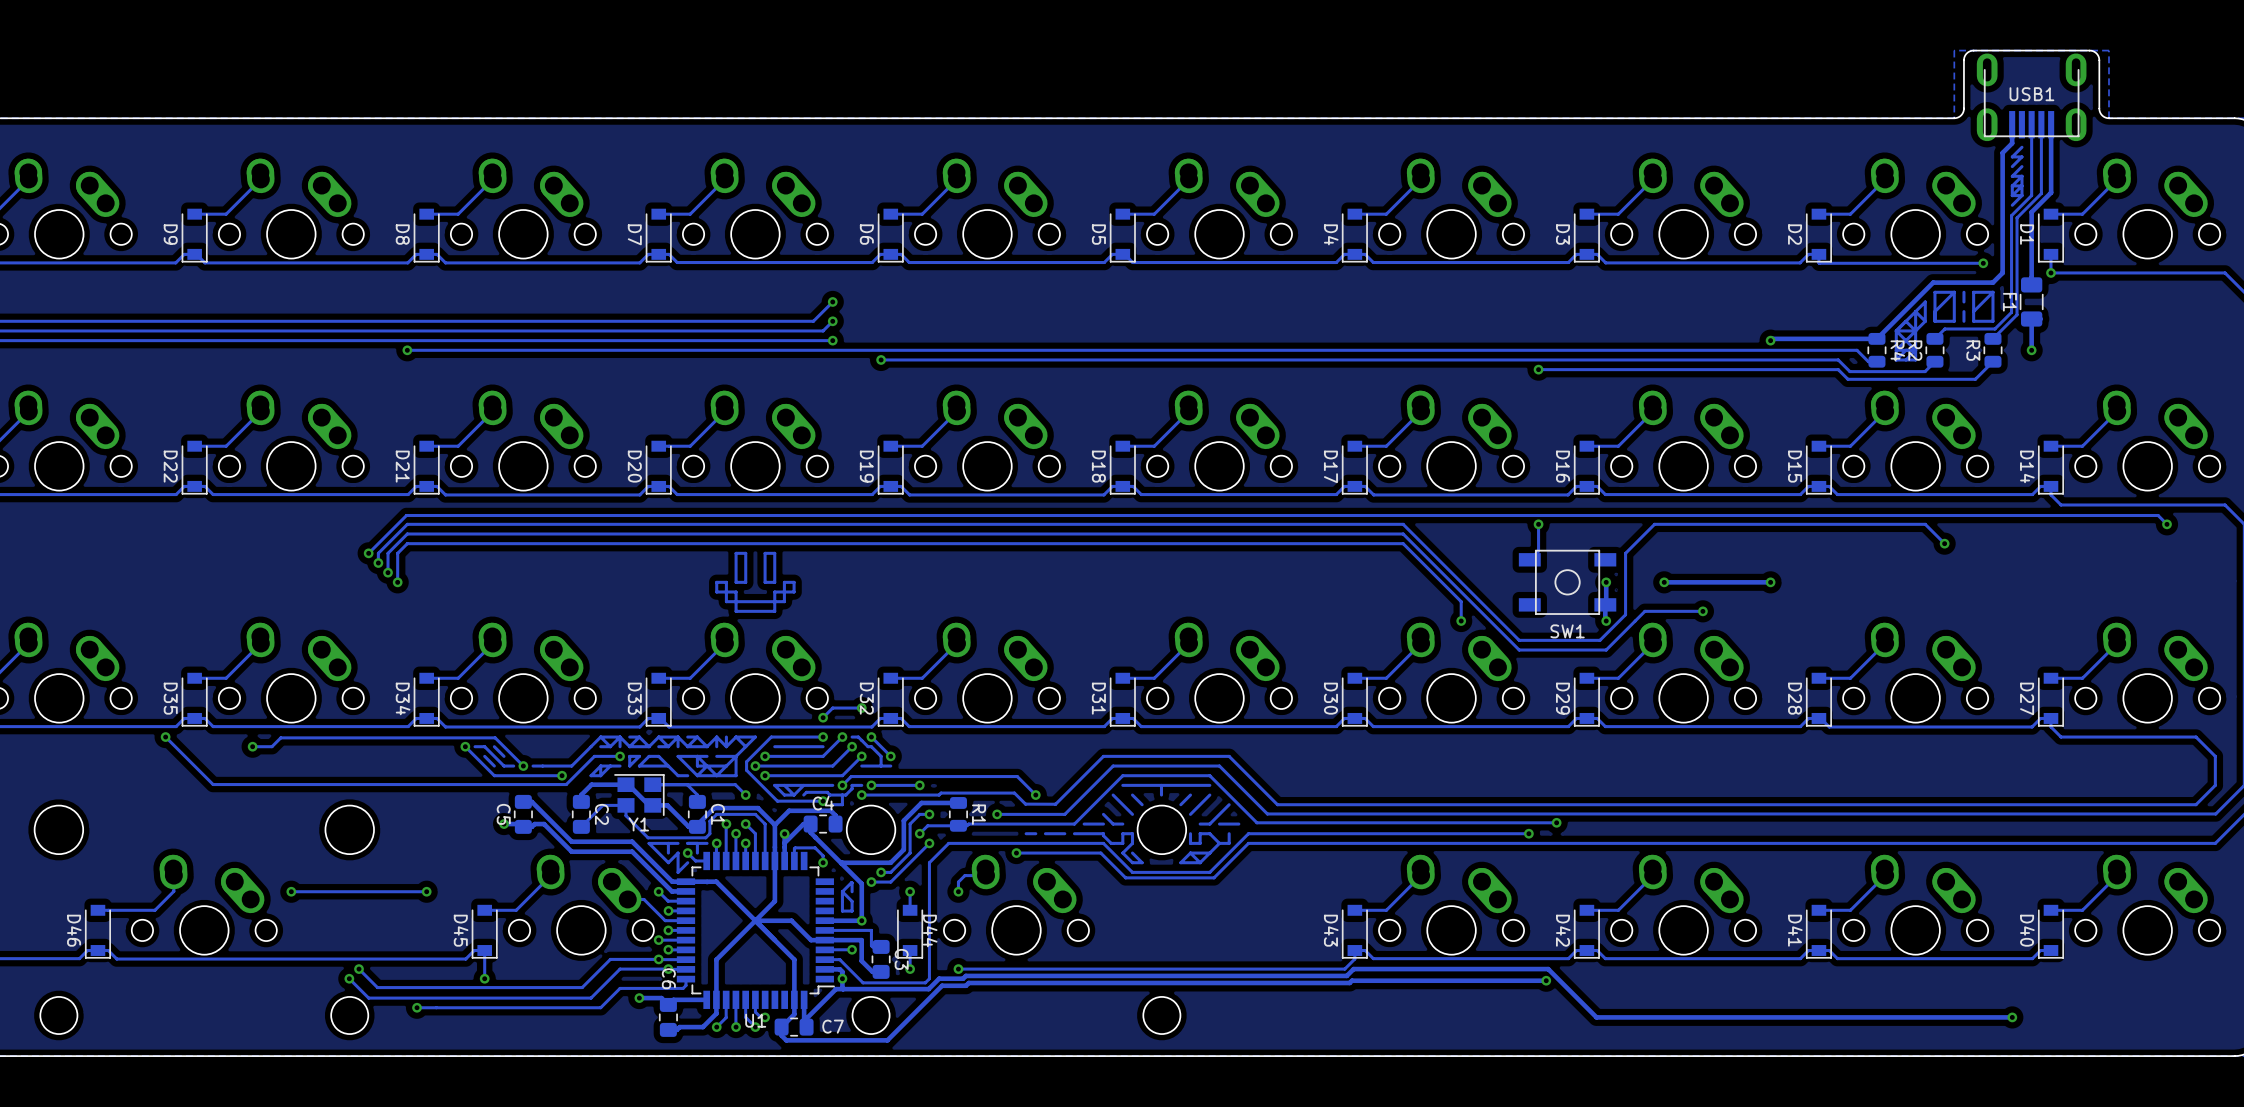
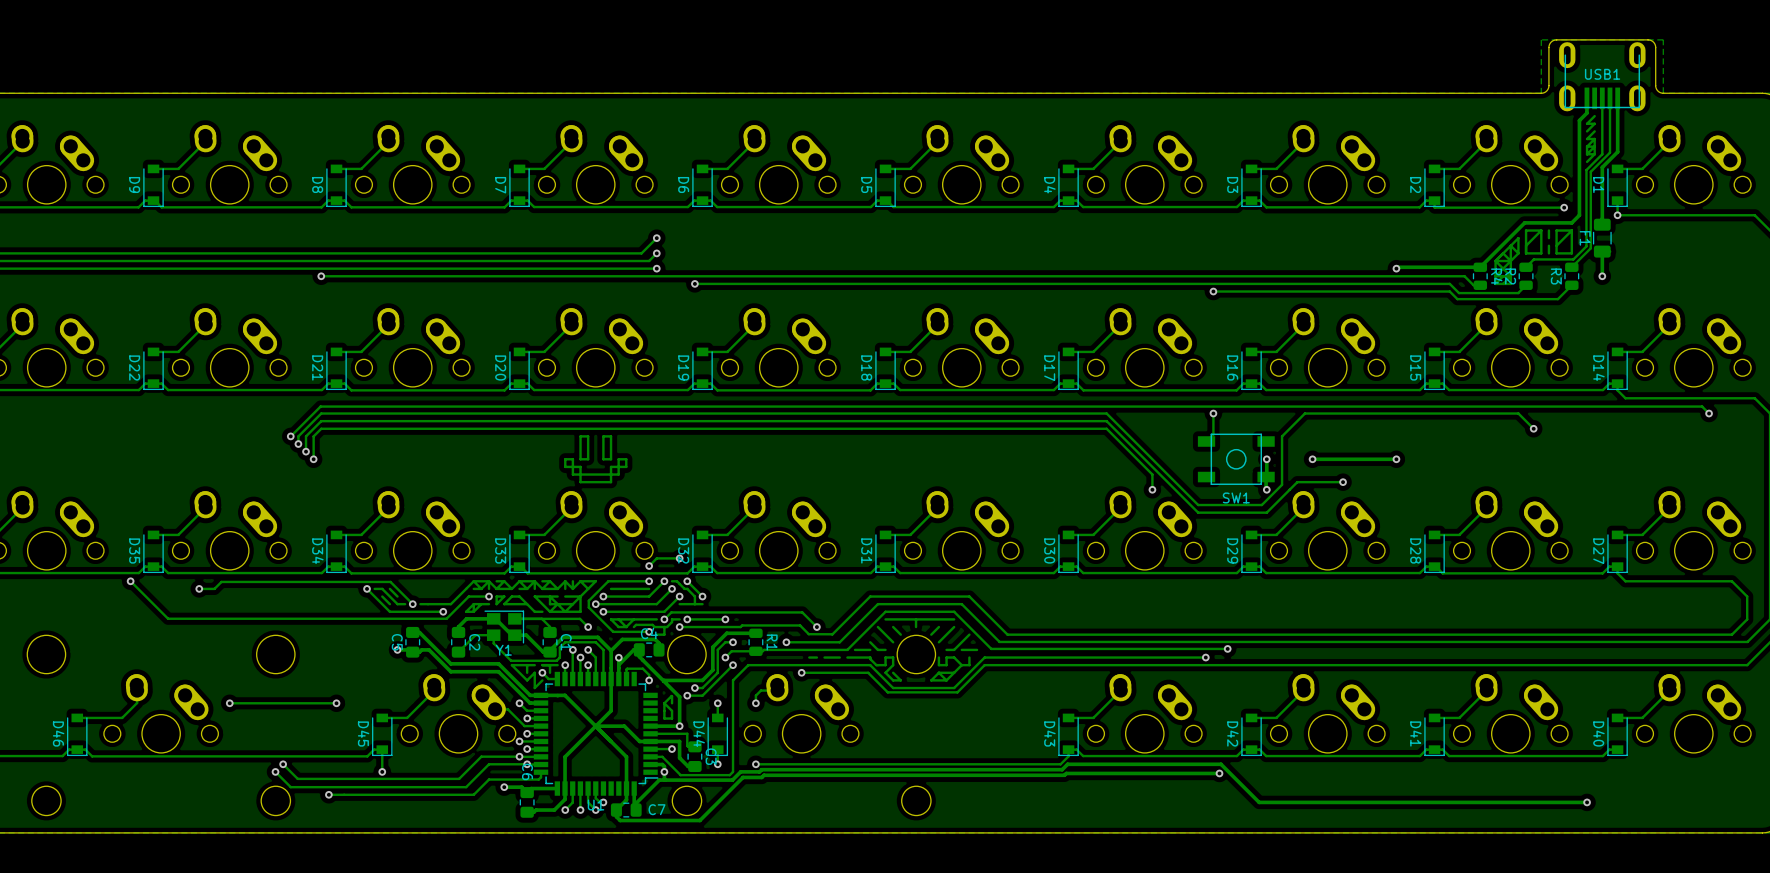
D44 name position: D44 (930, 930) -> D44 (699, 734)

